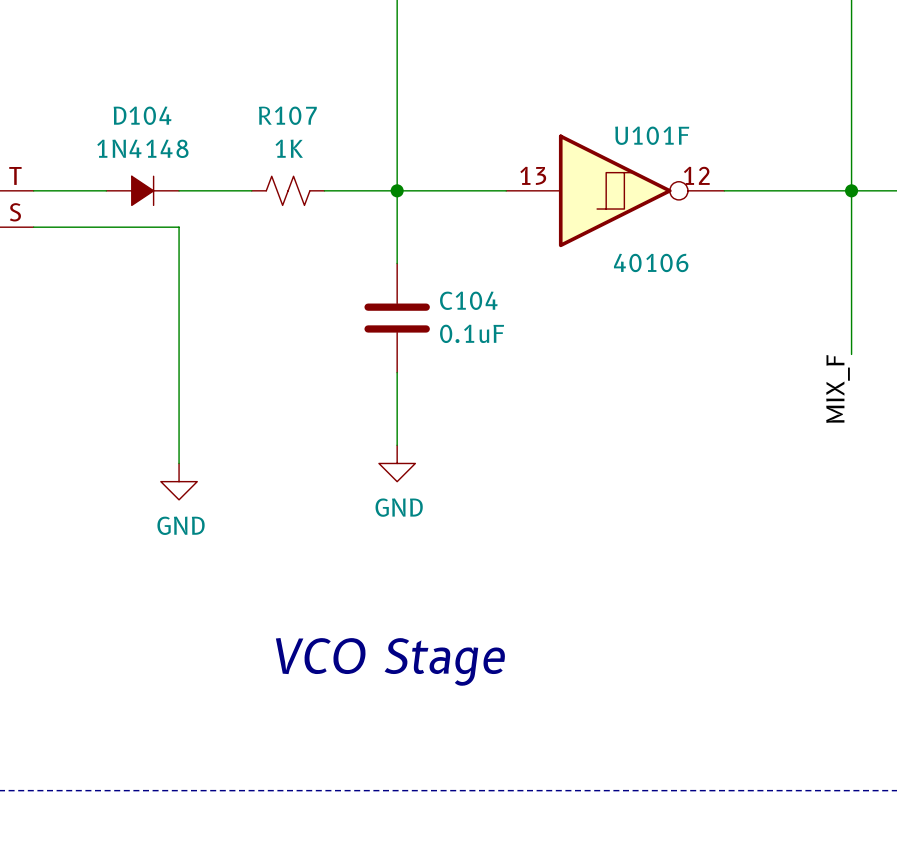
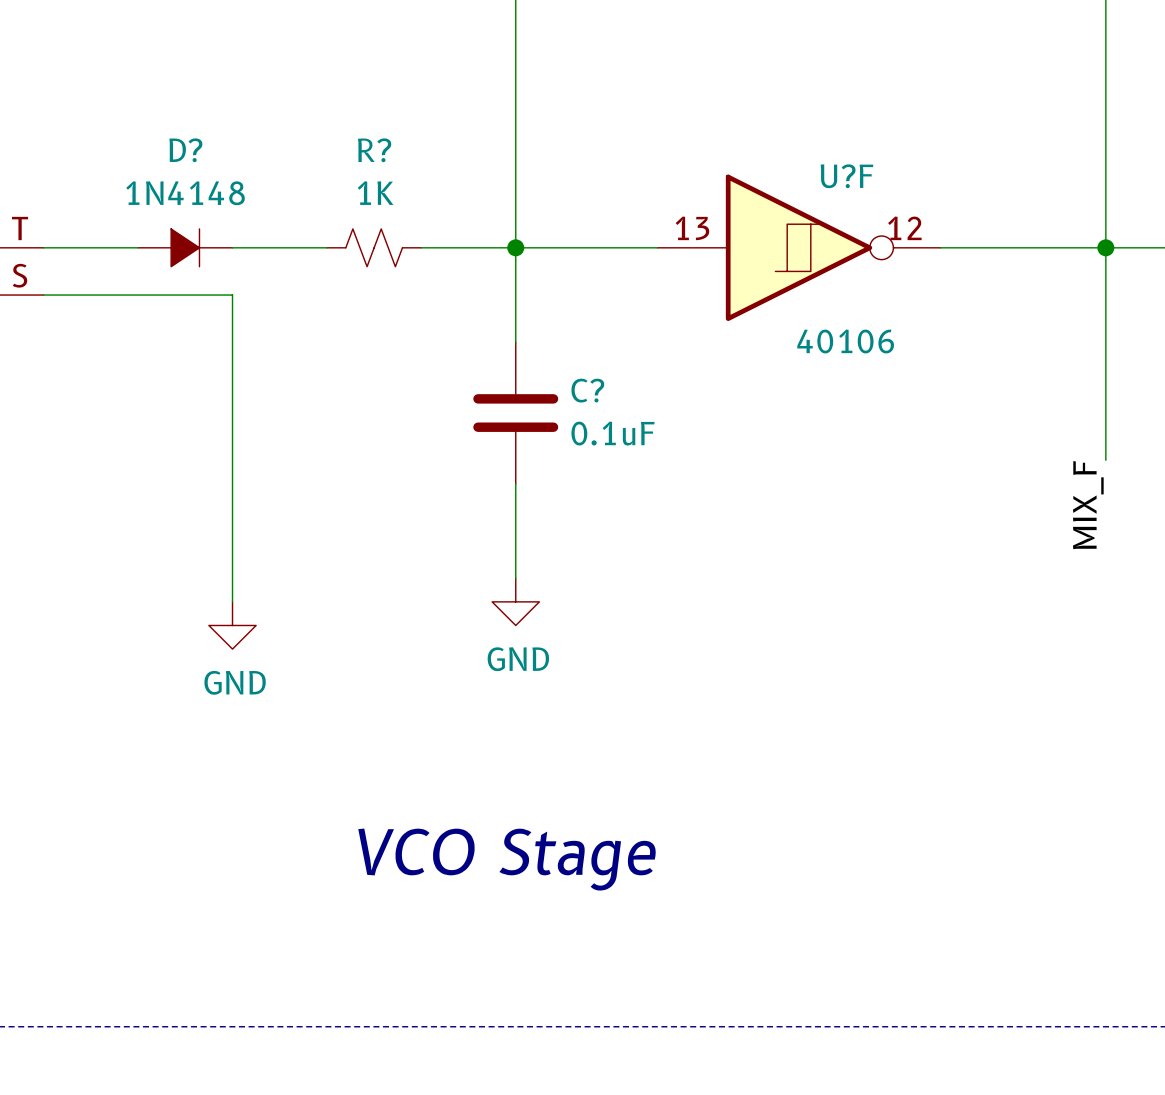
D104 name: D104 (142, 115) -> D? (185, 150)
R107 name: R107 (287, 115) -> R? (374, 150)
U101F name: U101F (652, 135) -> U?F (846, 176)
C104 name: C104 (468, 300) -> C? (587, 390)

